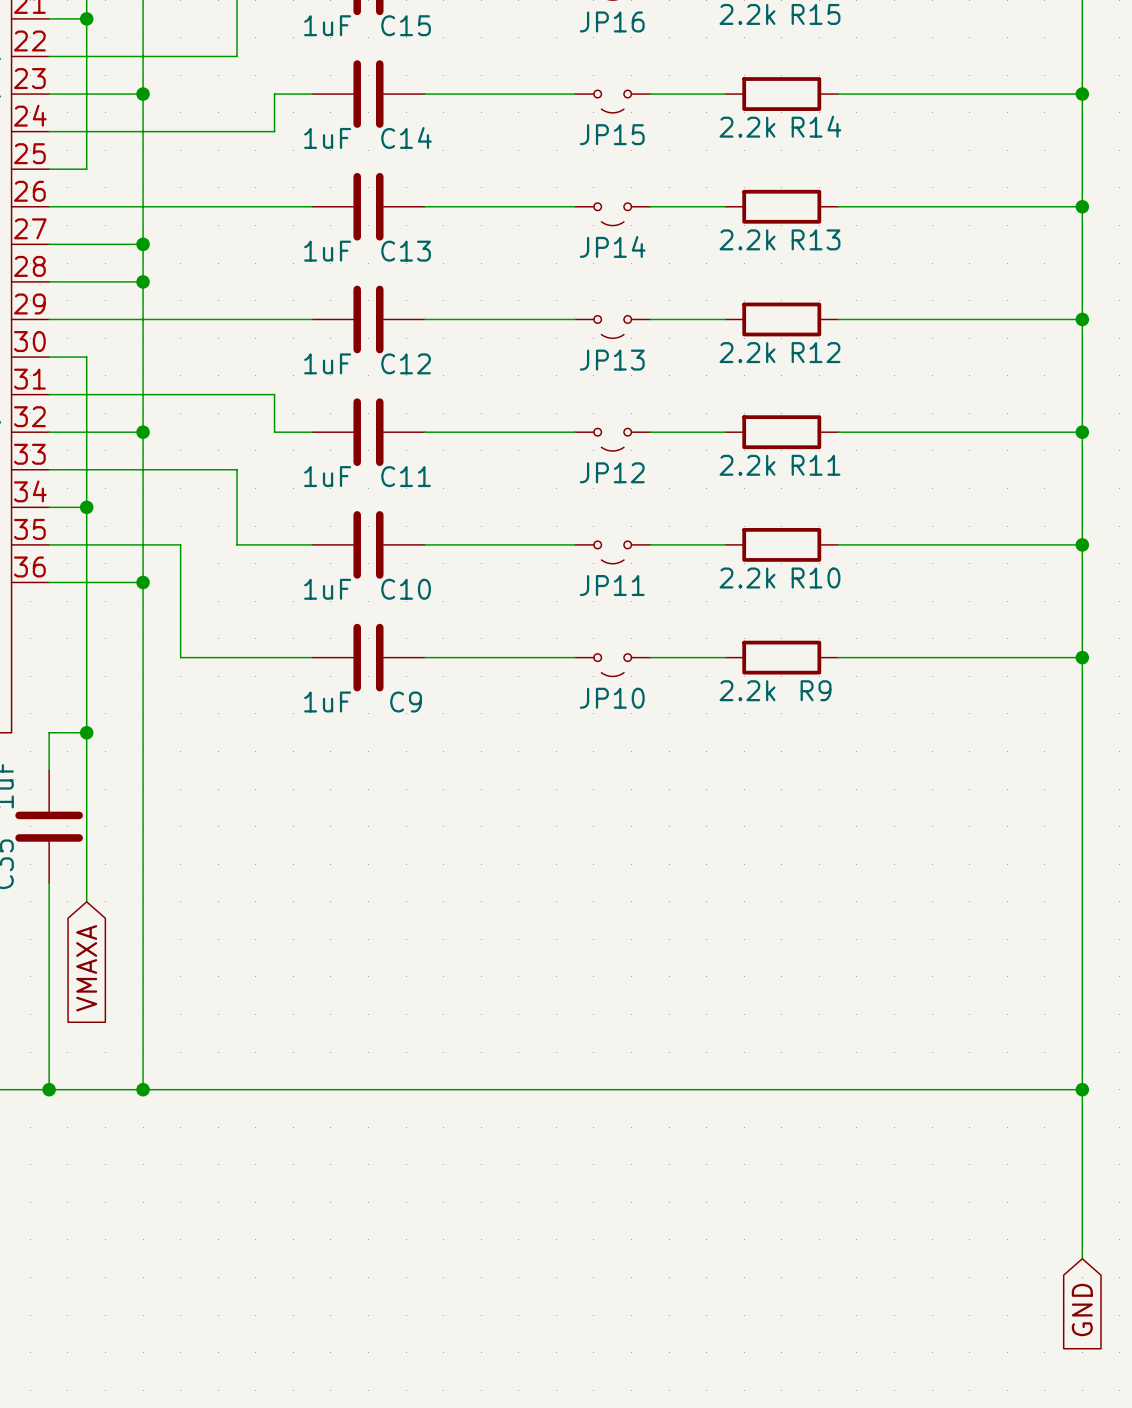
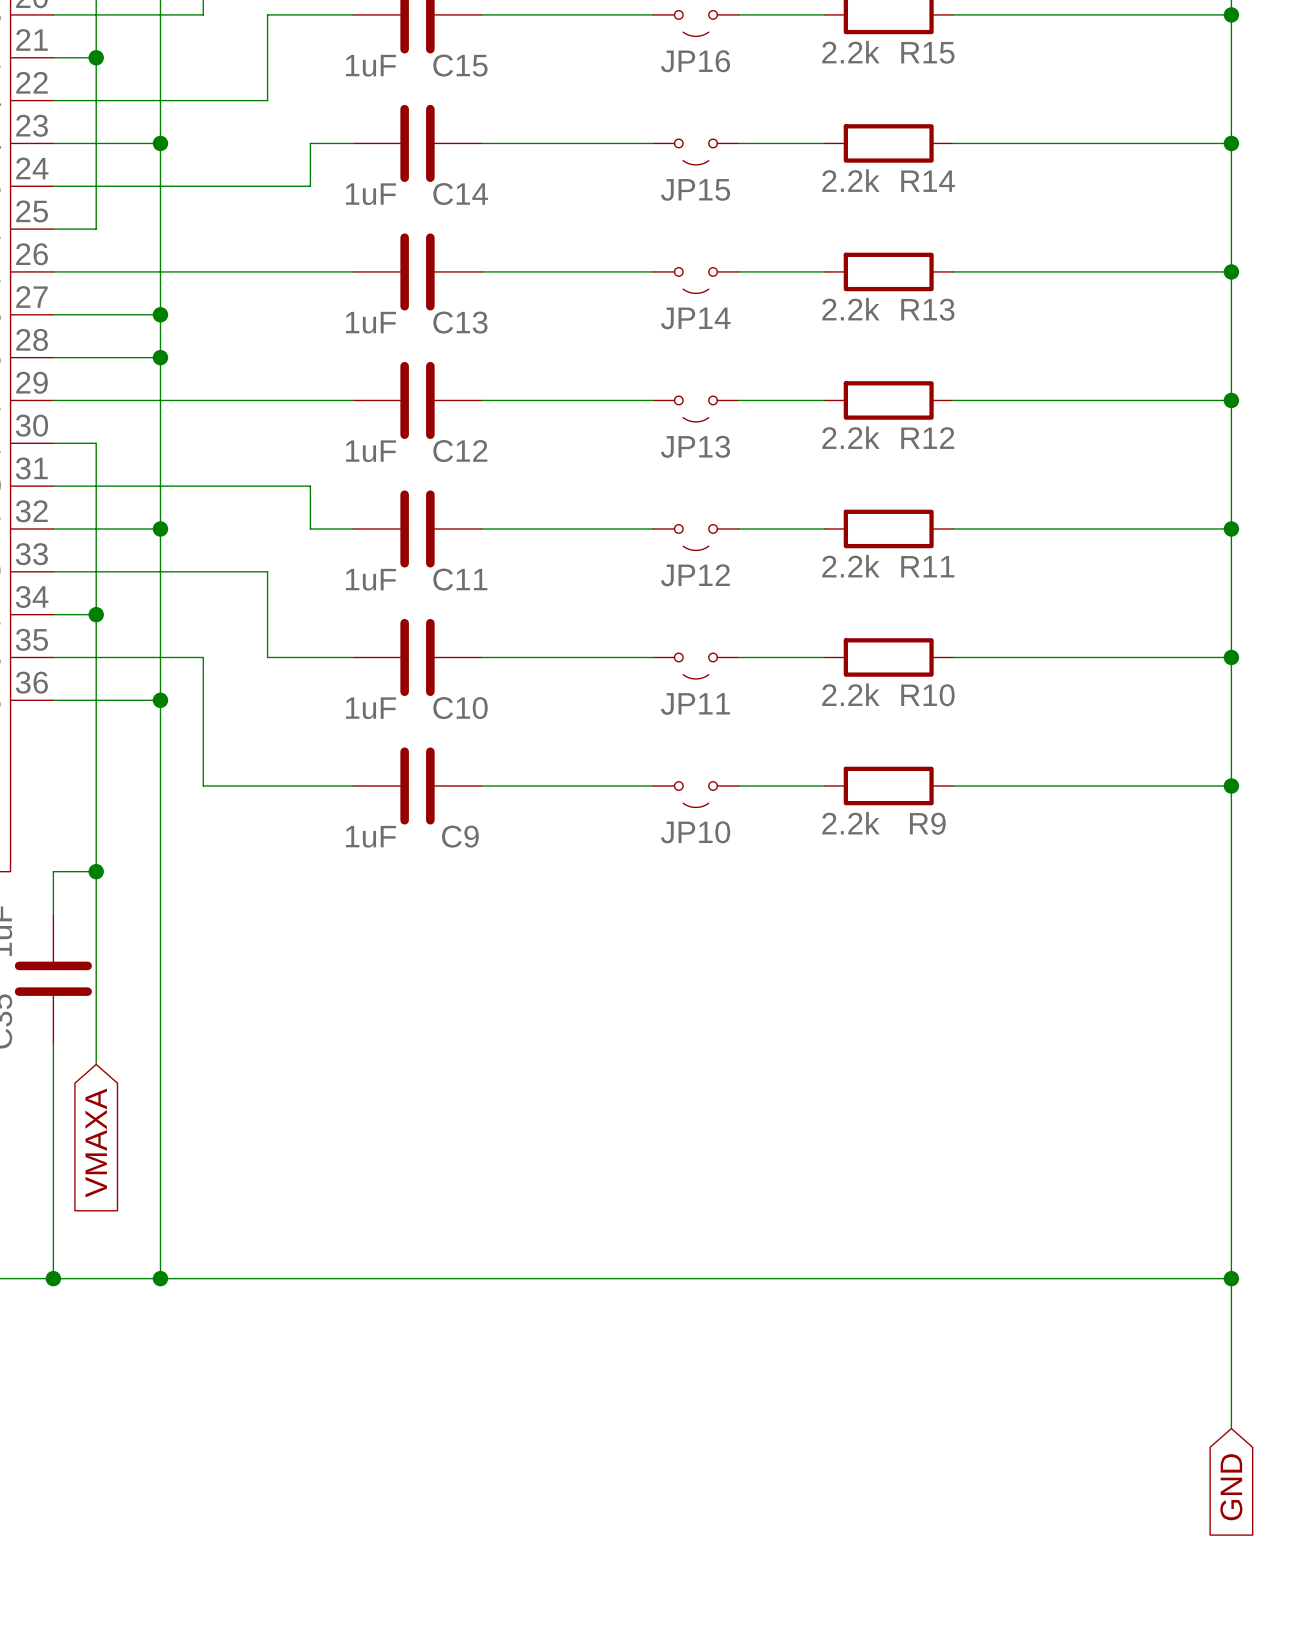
wire: (1082, 1221) (1082, 1258) -> none
global label position: GND (1082, 1310) -> GND (1231, 1487)

